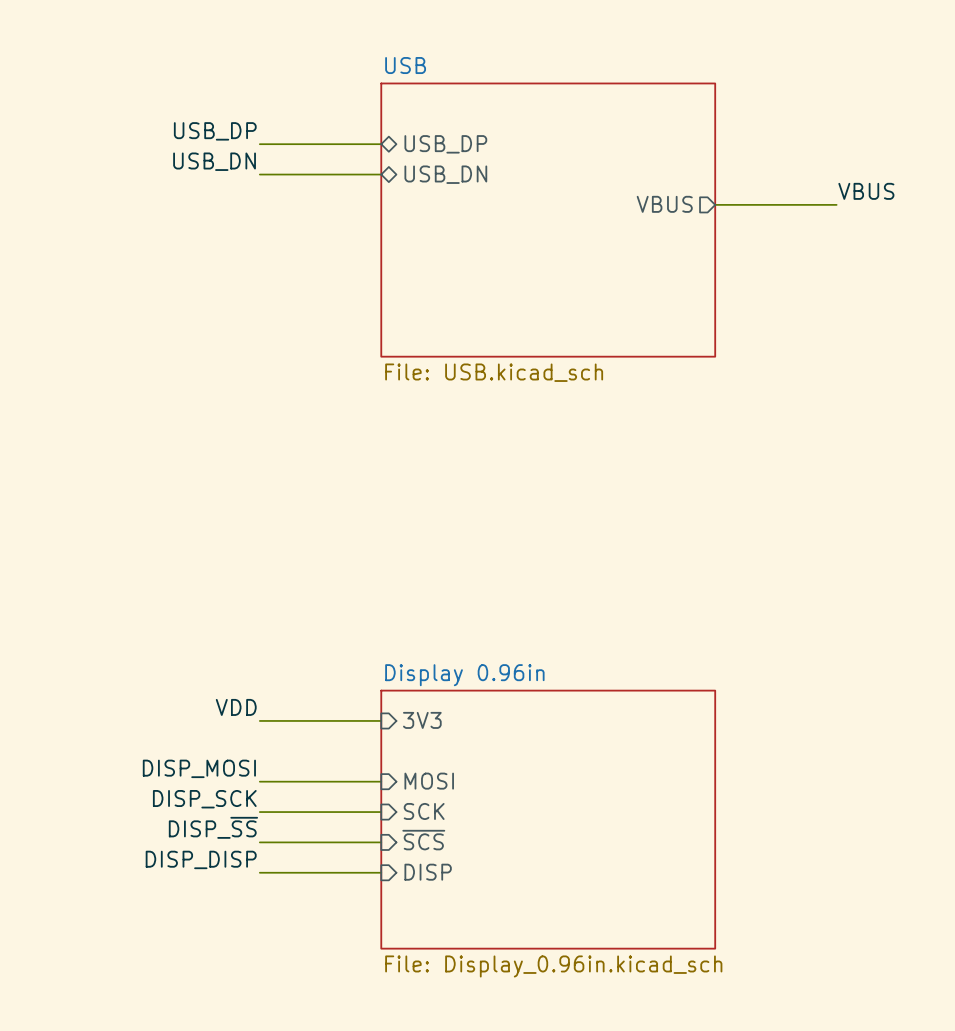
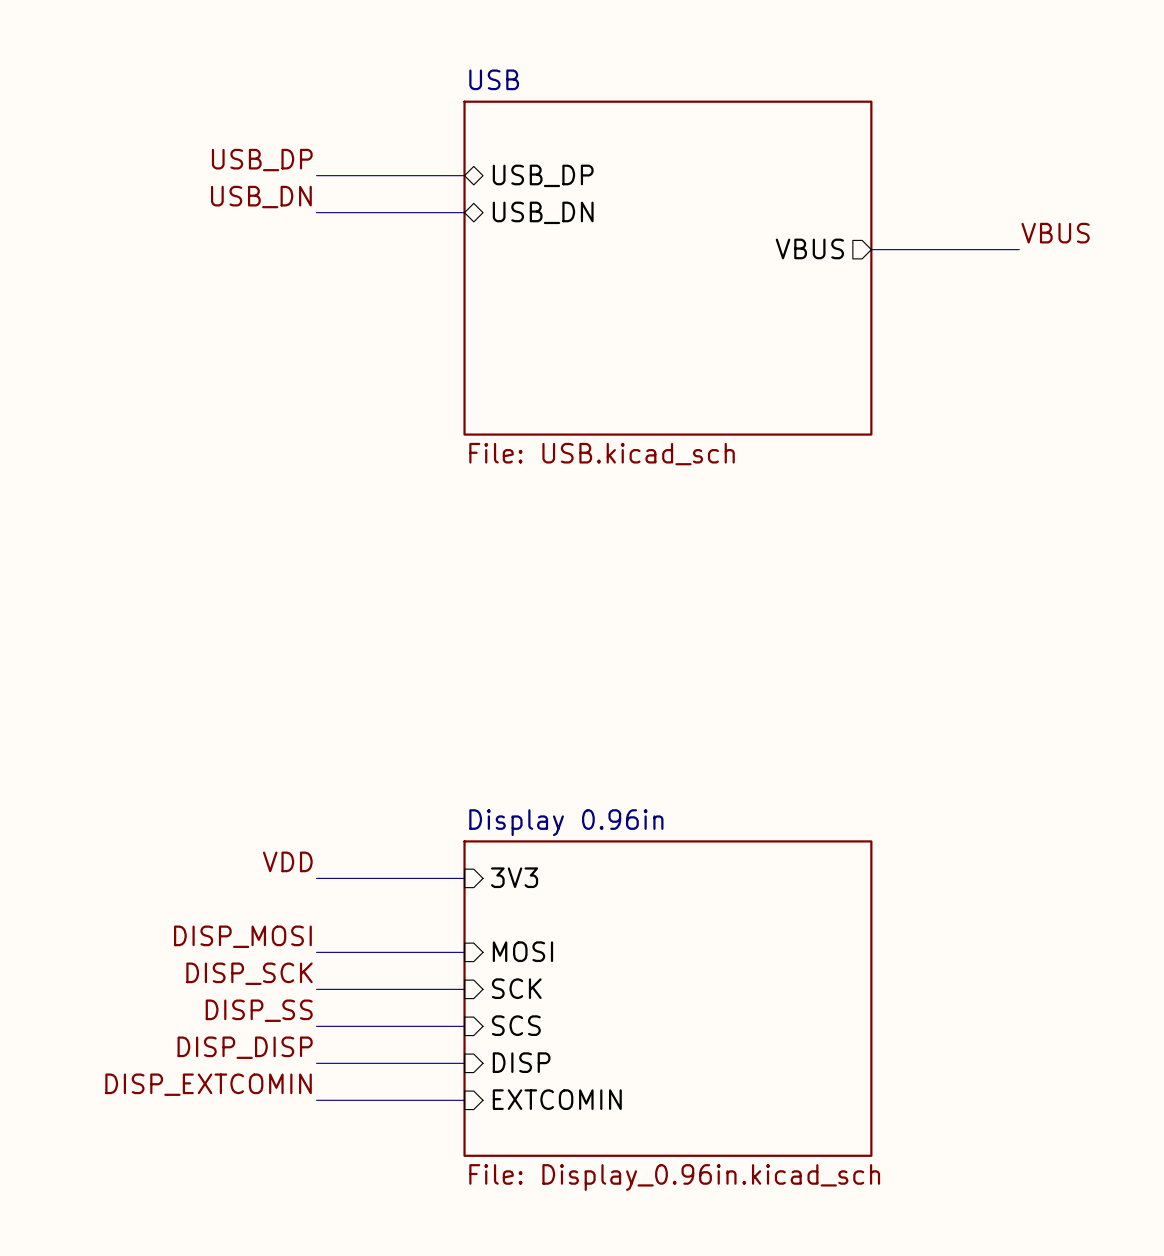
label: DISP_~{SS} (213, 827) -> DISP_SS (259, 1010)
sheet pin: ~{SCS} (423, 840) -> SCS (516, 1025)
label: none -> DISP_EXTCOMIN (208, 1084)
sheet pin: none -> EXTCOMIN (557, 1099)
wire: none -> (316, 1100) (464, 1100)

